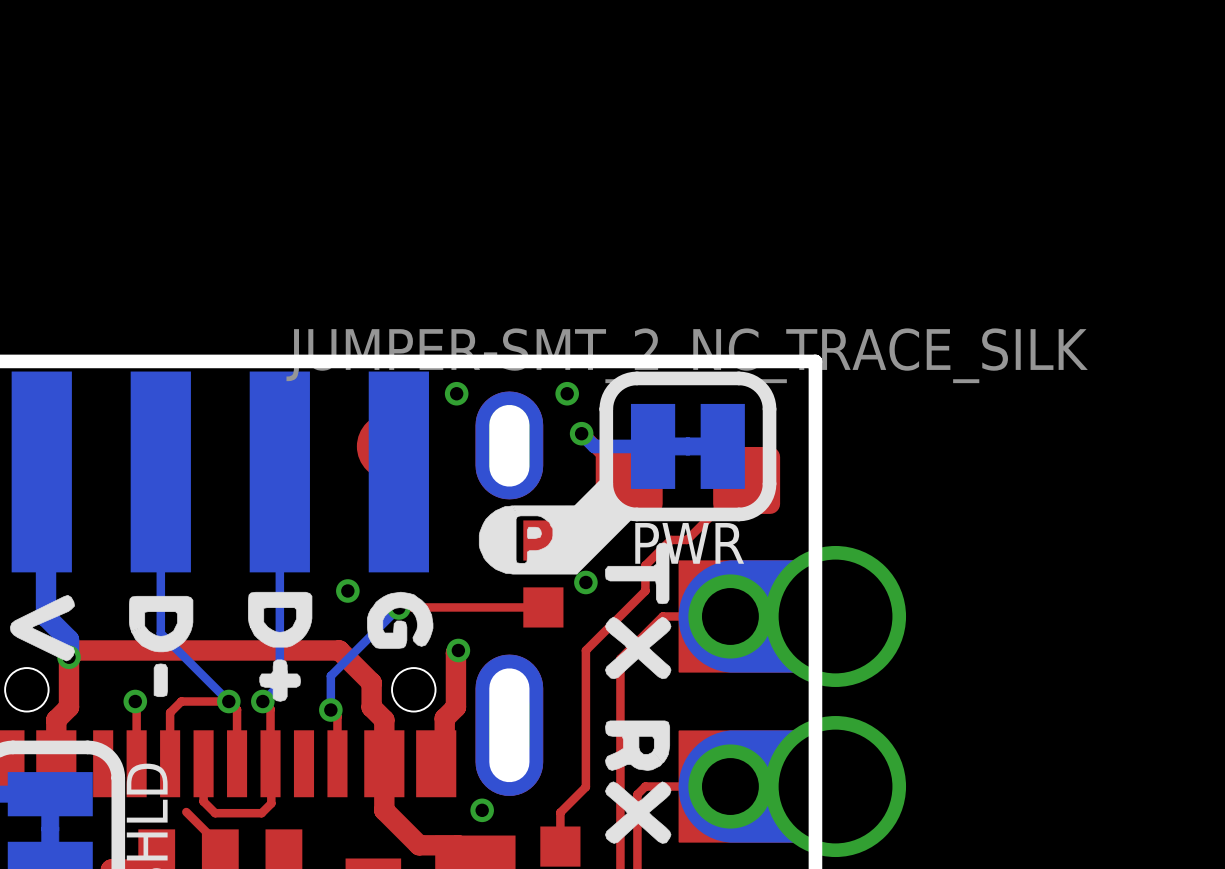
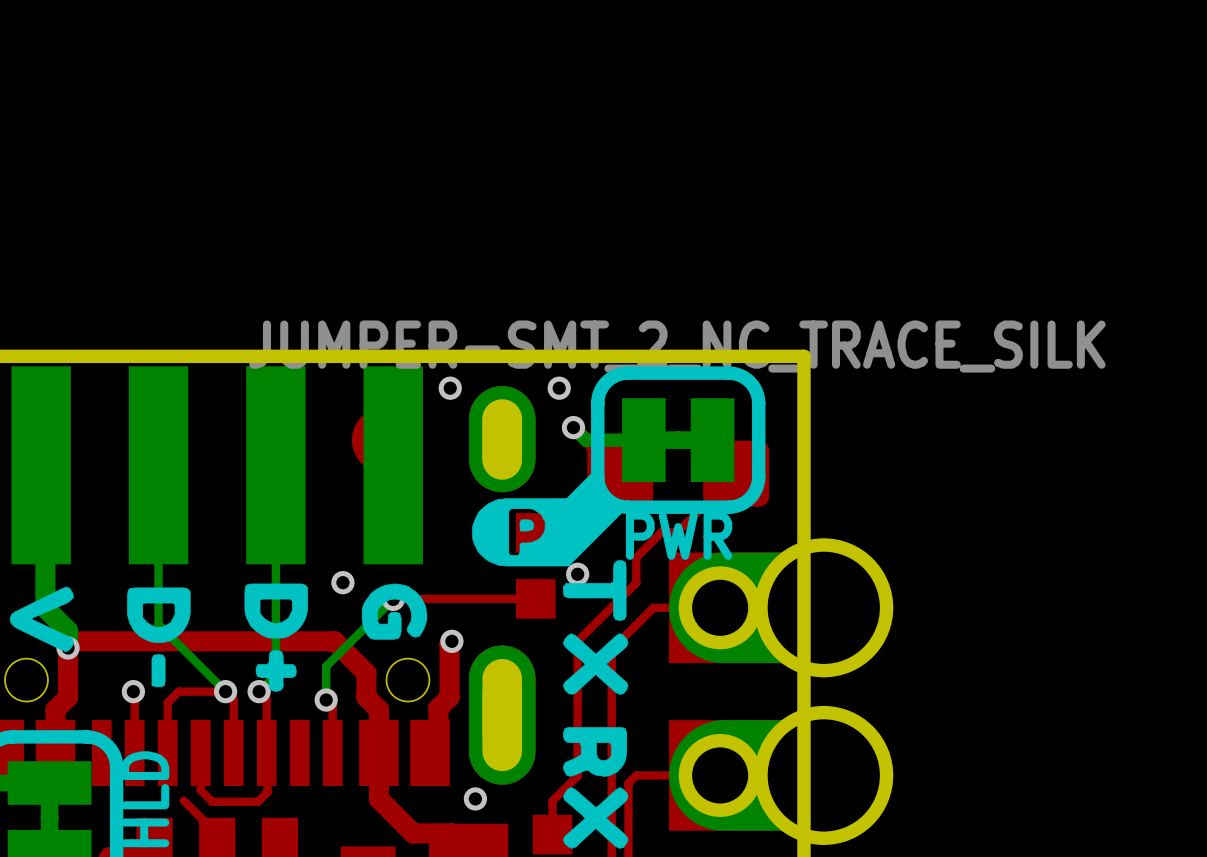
drawing position: (638, 610) -> (595, 627)
drawing position: (638, 782) -> (595, 787)

